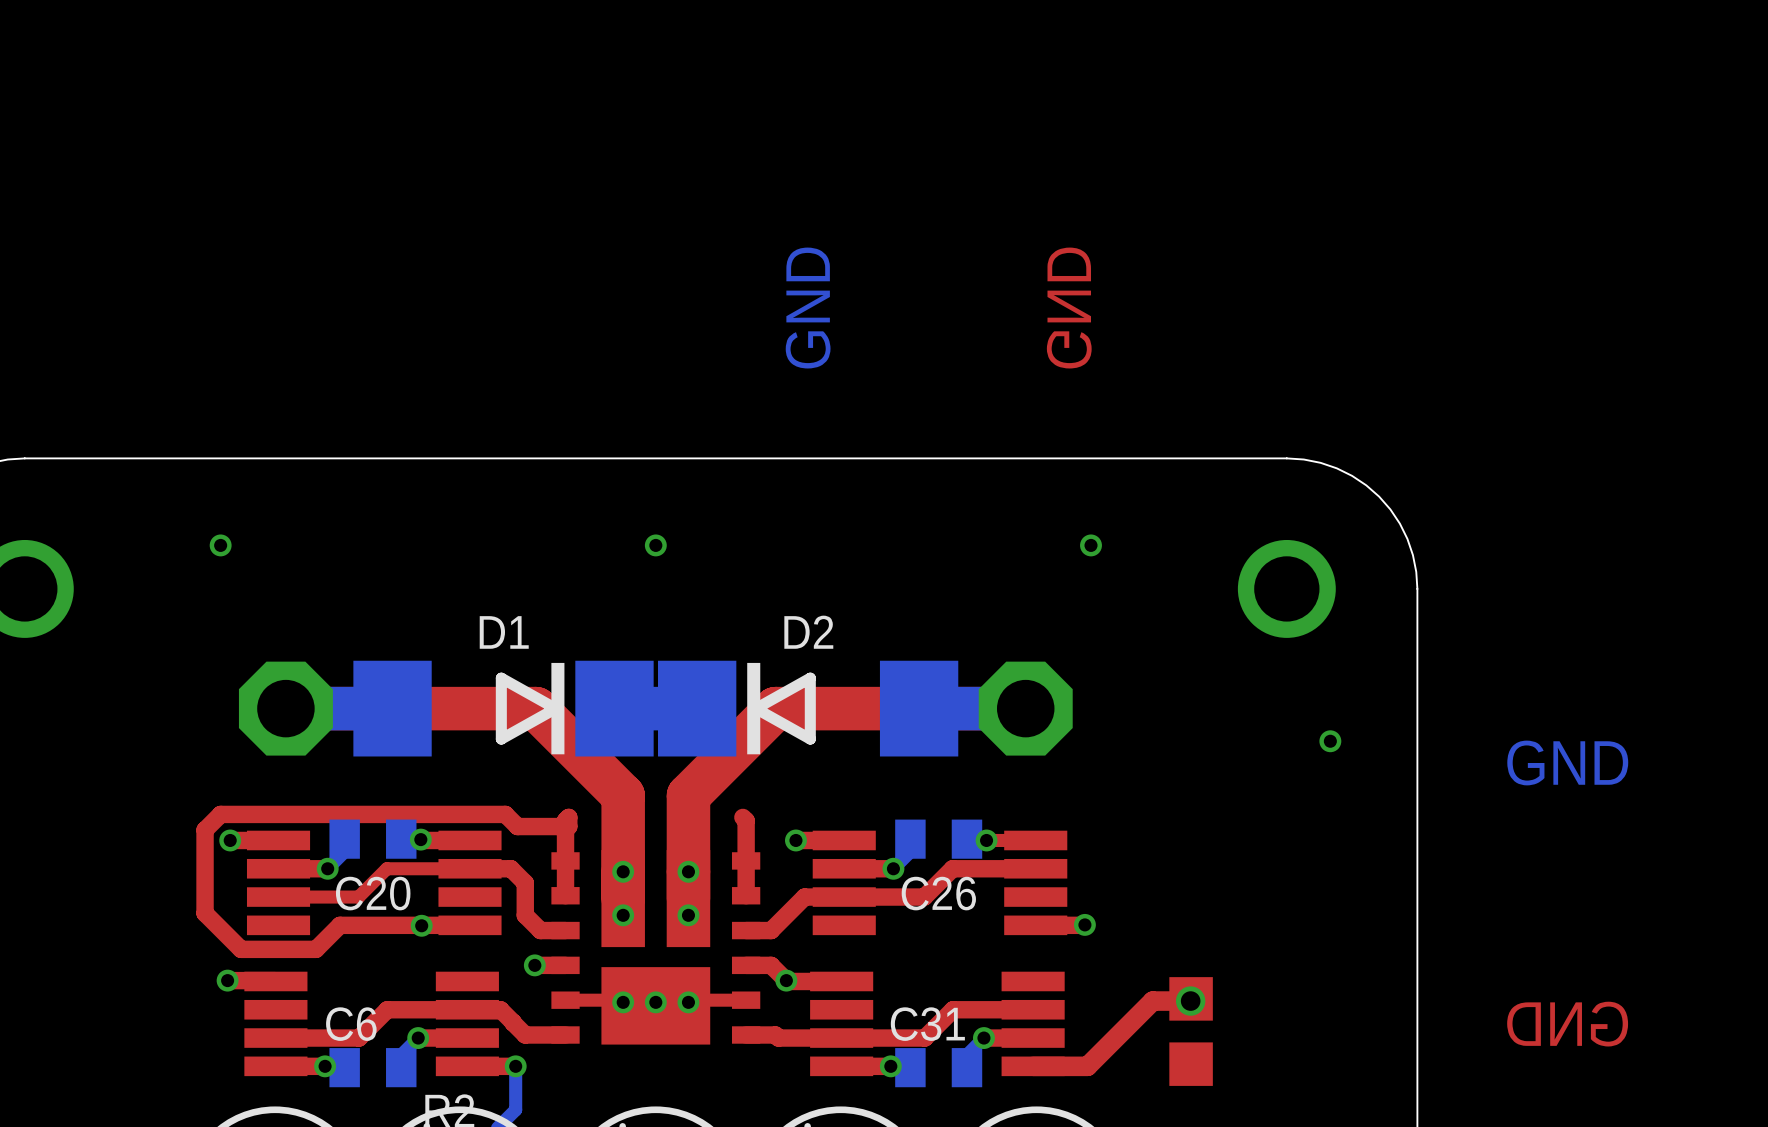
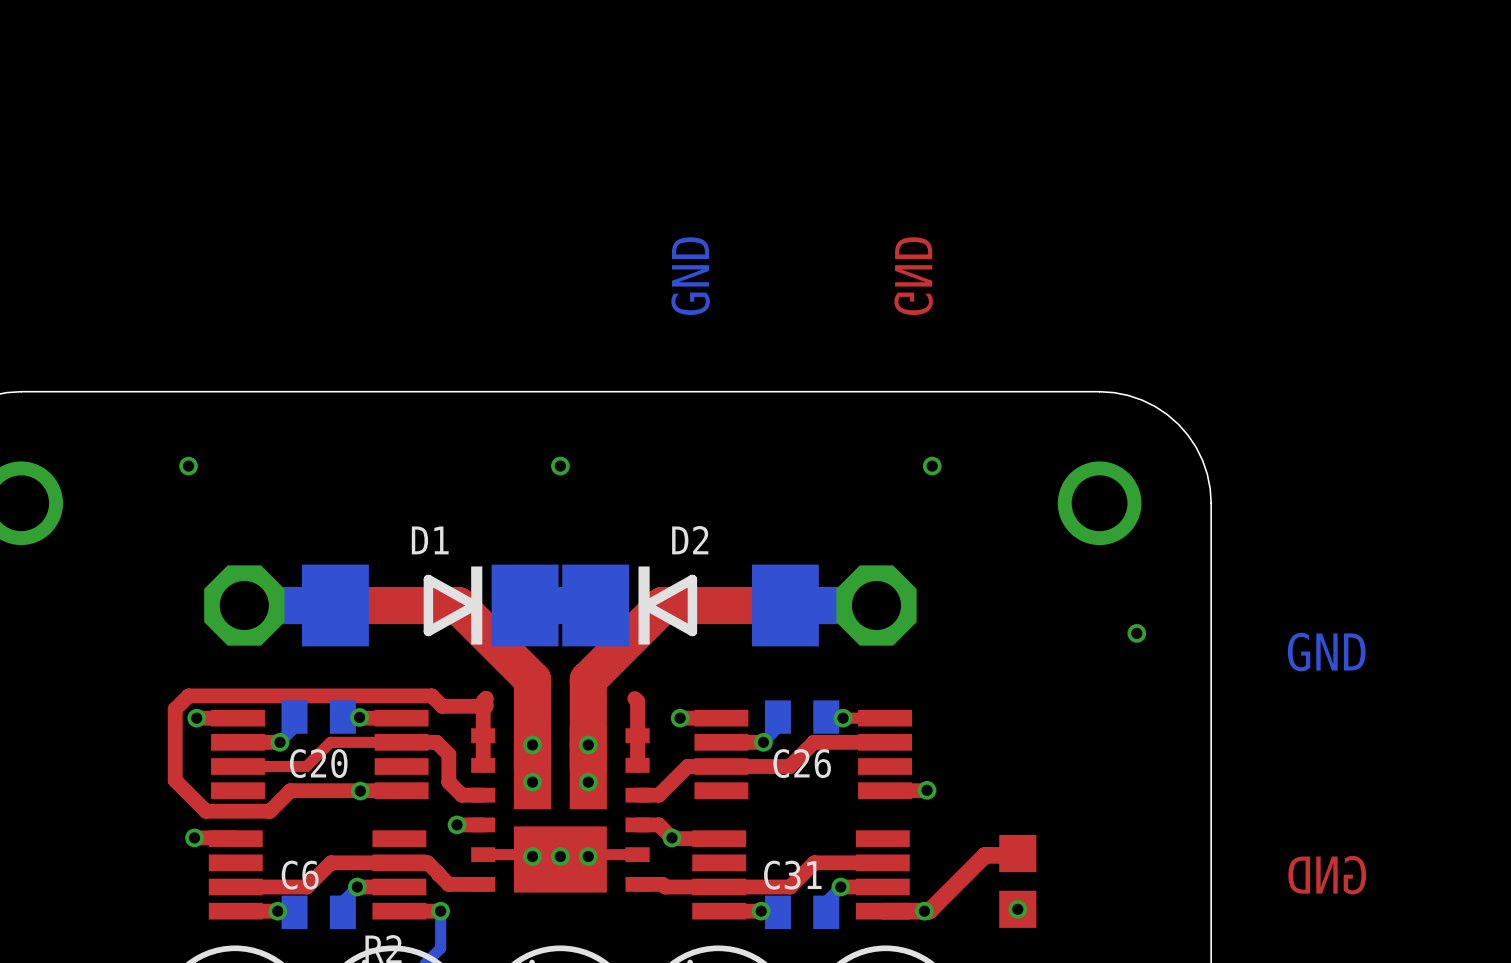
via: (1190, 1001) -> none
via: none -> (1017, 909)
via: none -> (924, 911)

